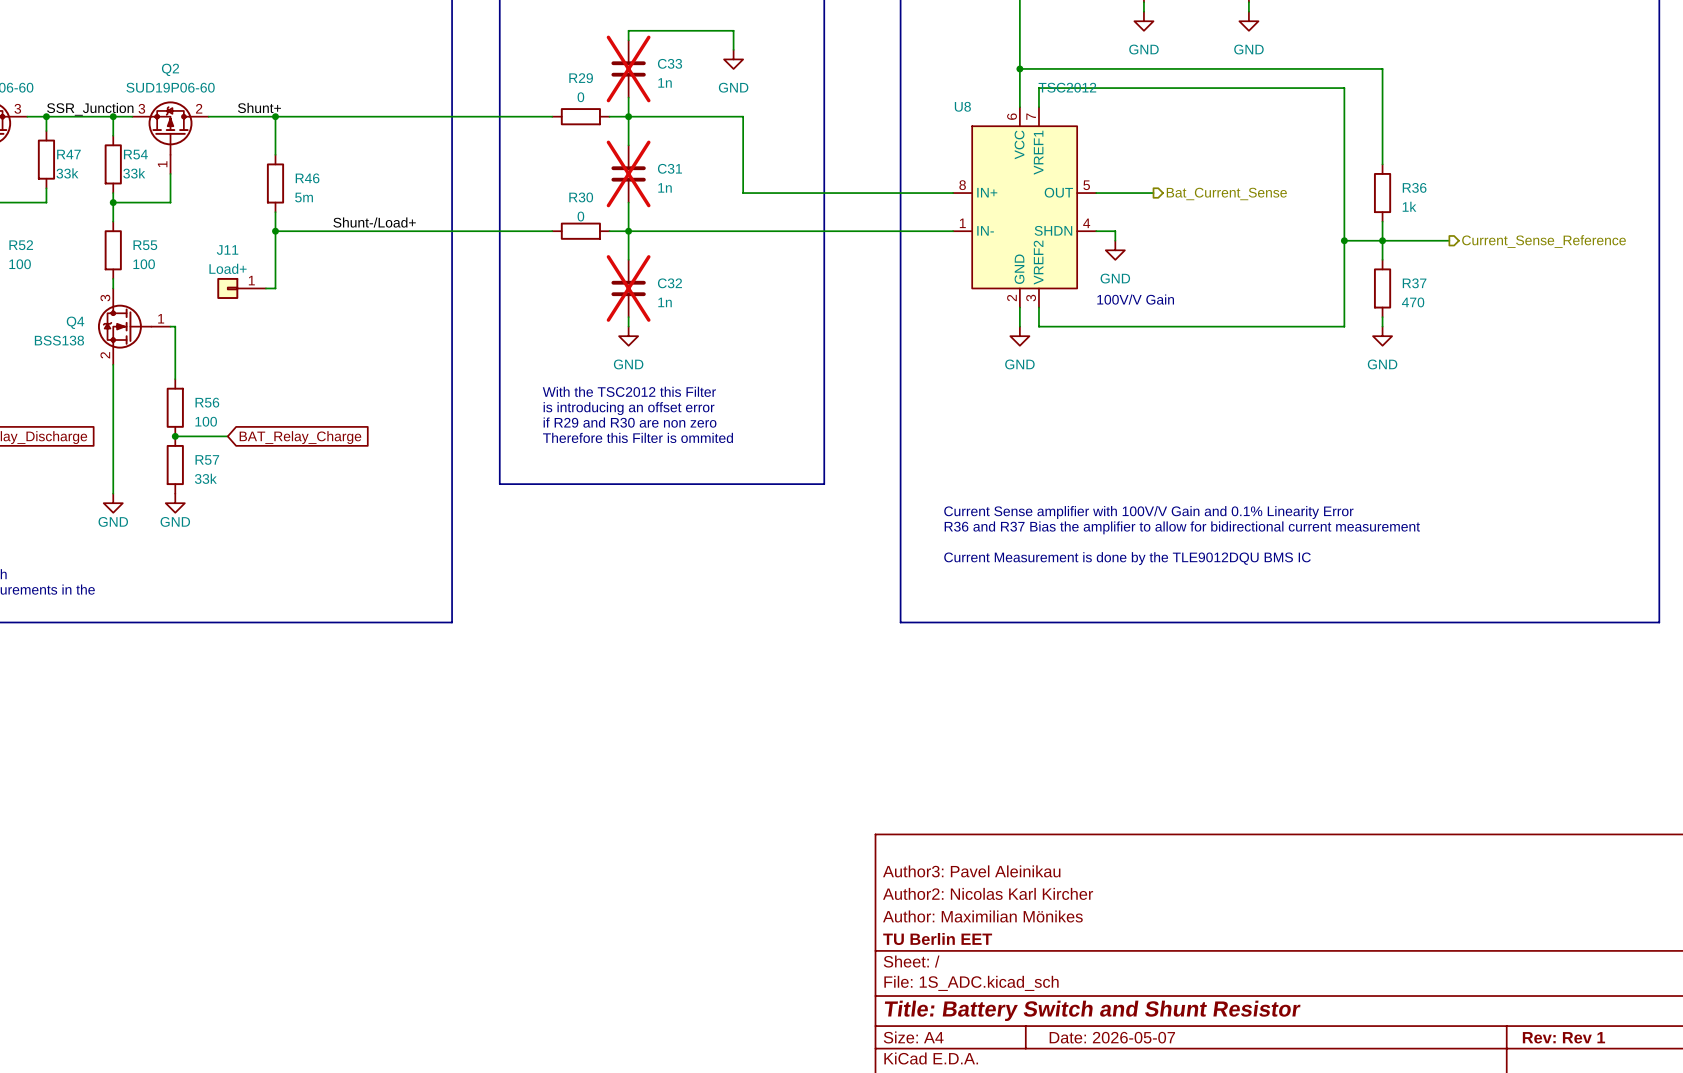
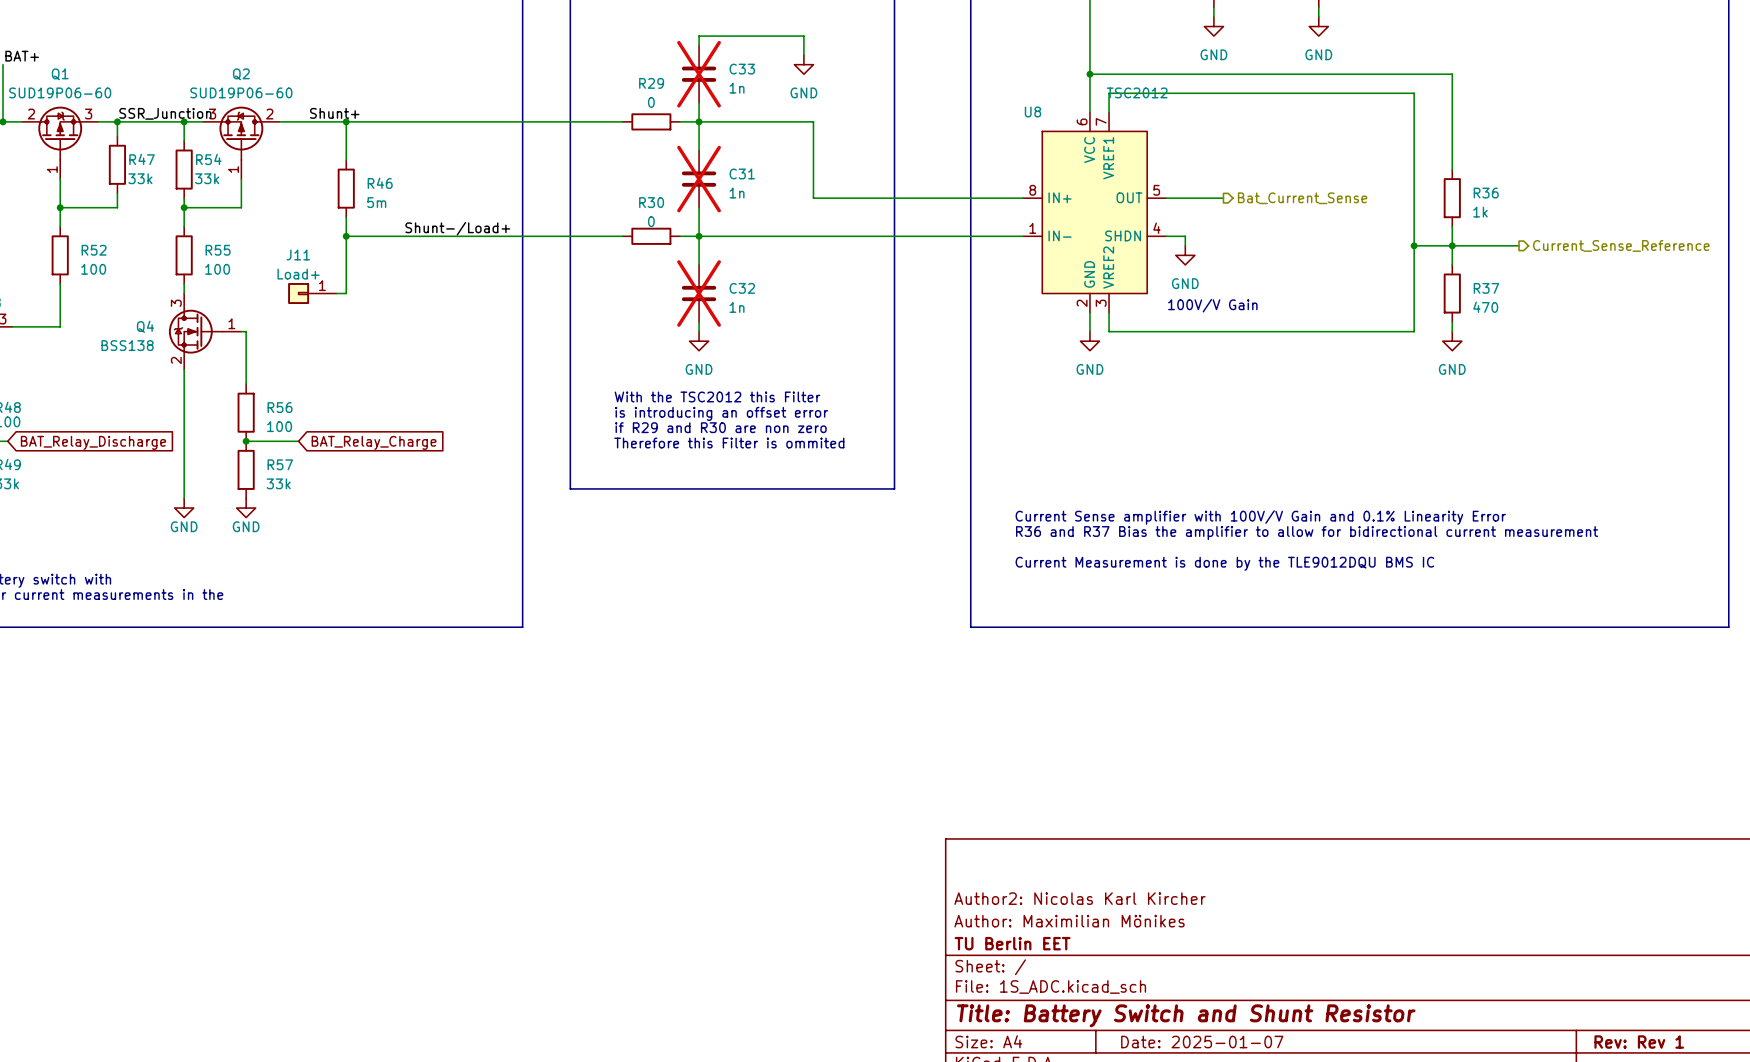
title block: Author3: Pavel Aleinikau (971, 871) -> none
title block: Date: 2026-05-07 (1112, 1037) -> Date: 2025-01-07 (1202, 1042)

